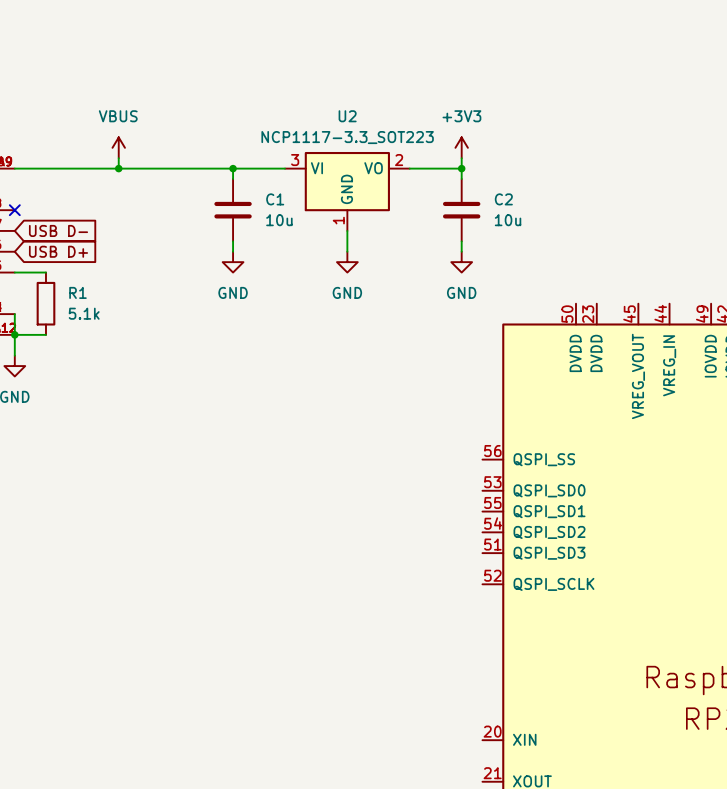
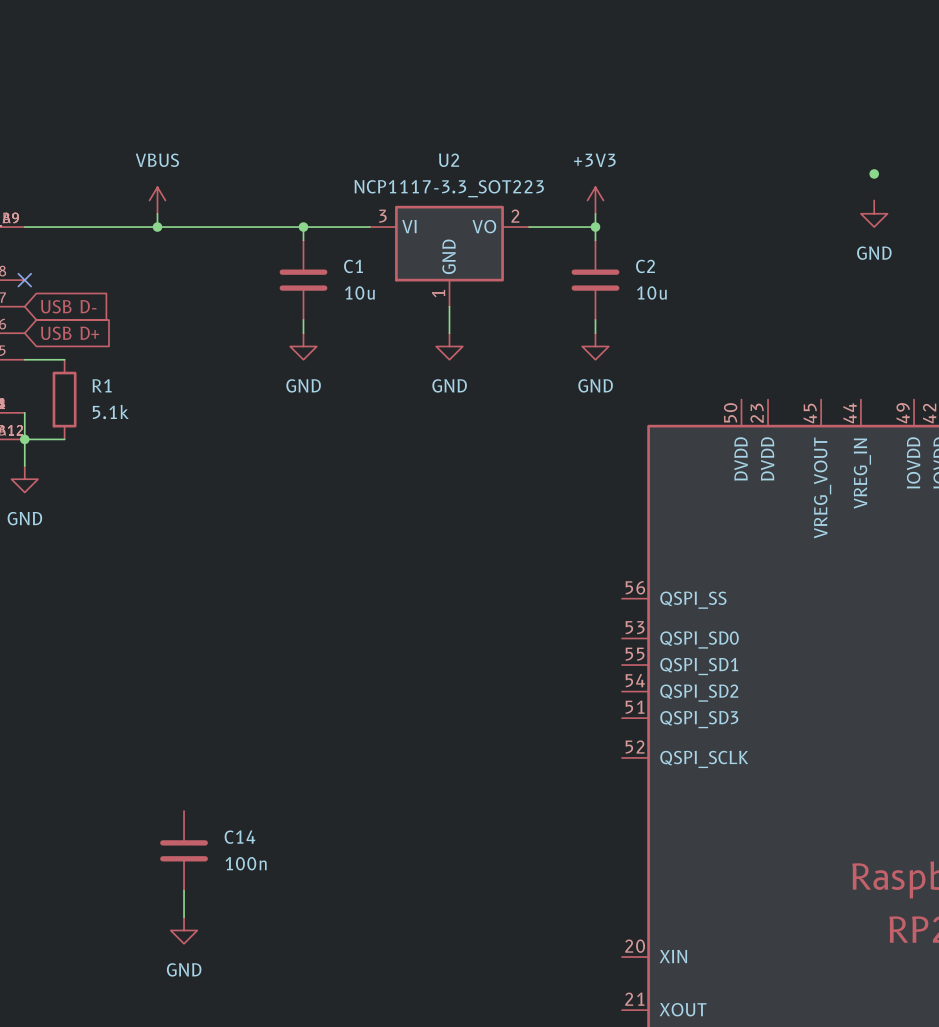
junction: none -> (874, 173)
power symbol: none -> GND (874, 213)
C14: none -> 100n (184, 850)
wire: none -> (184, 890) (184, 917)
power symbol: none -> GND (184, 930)

